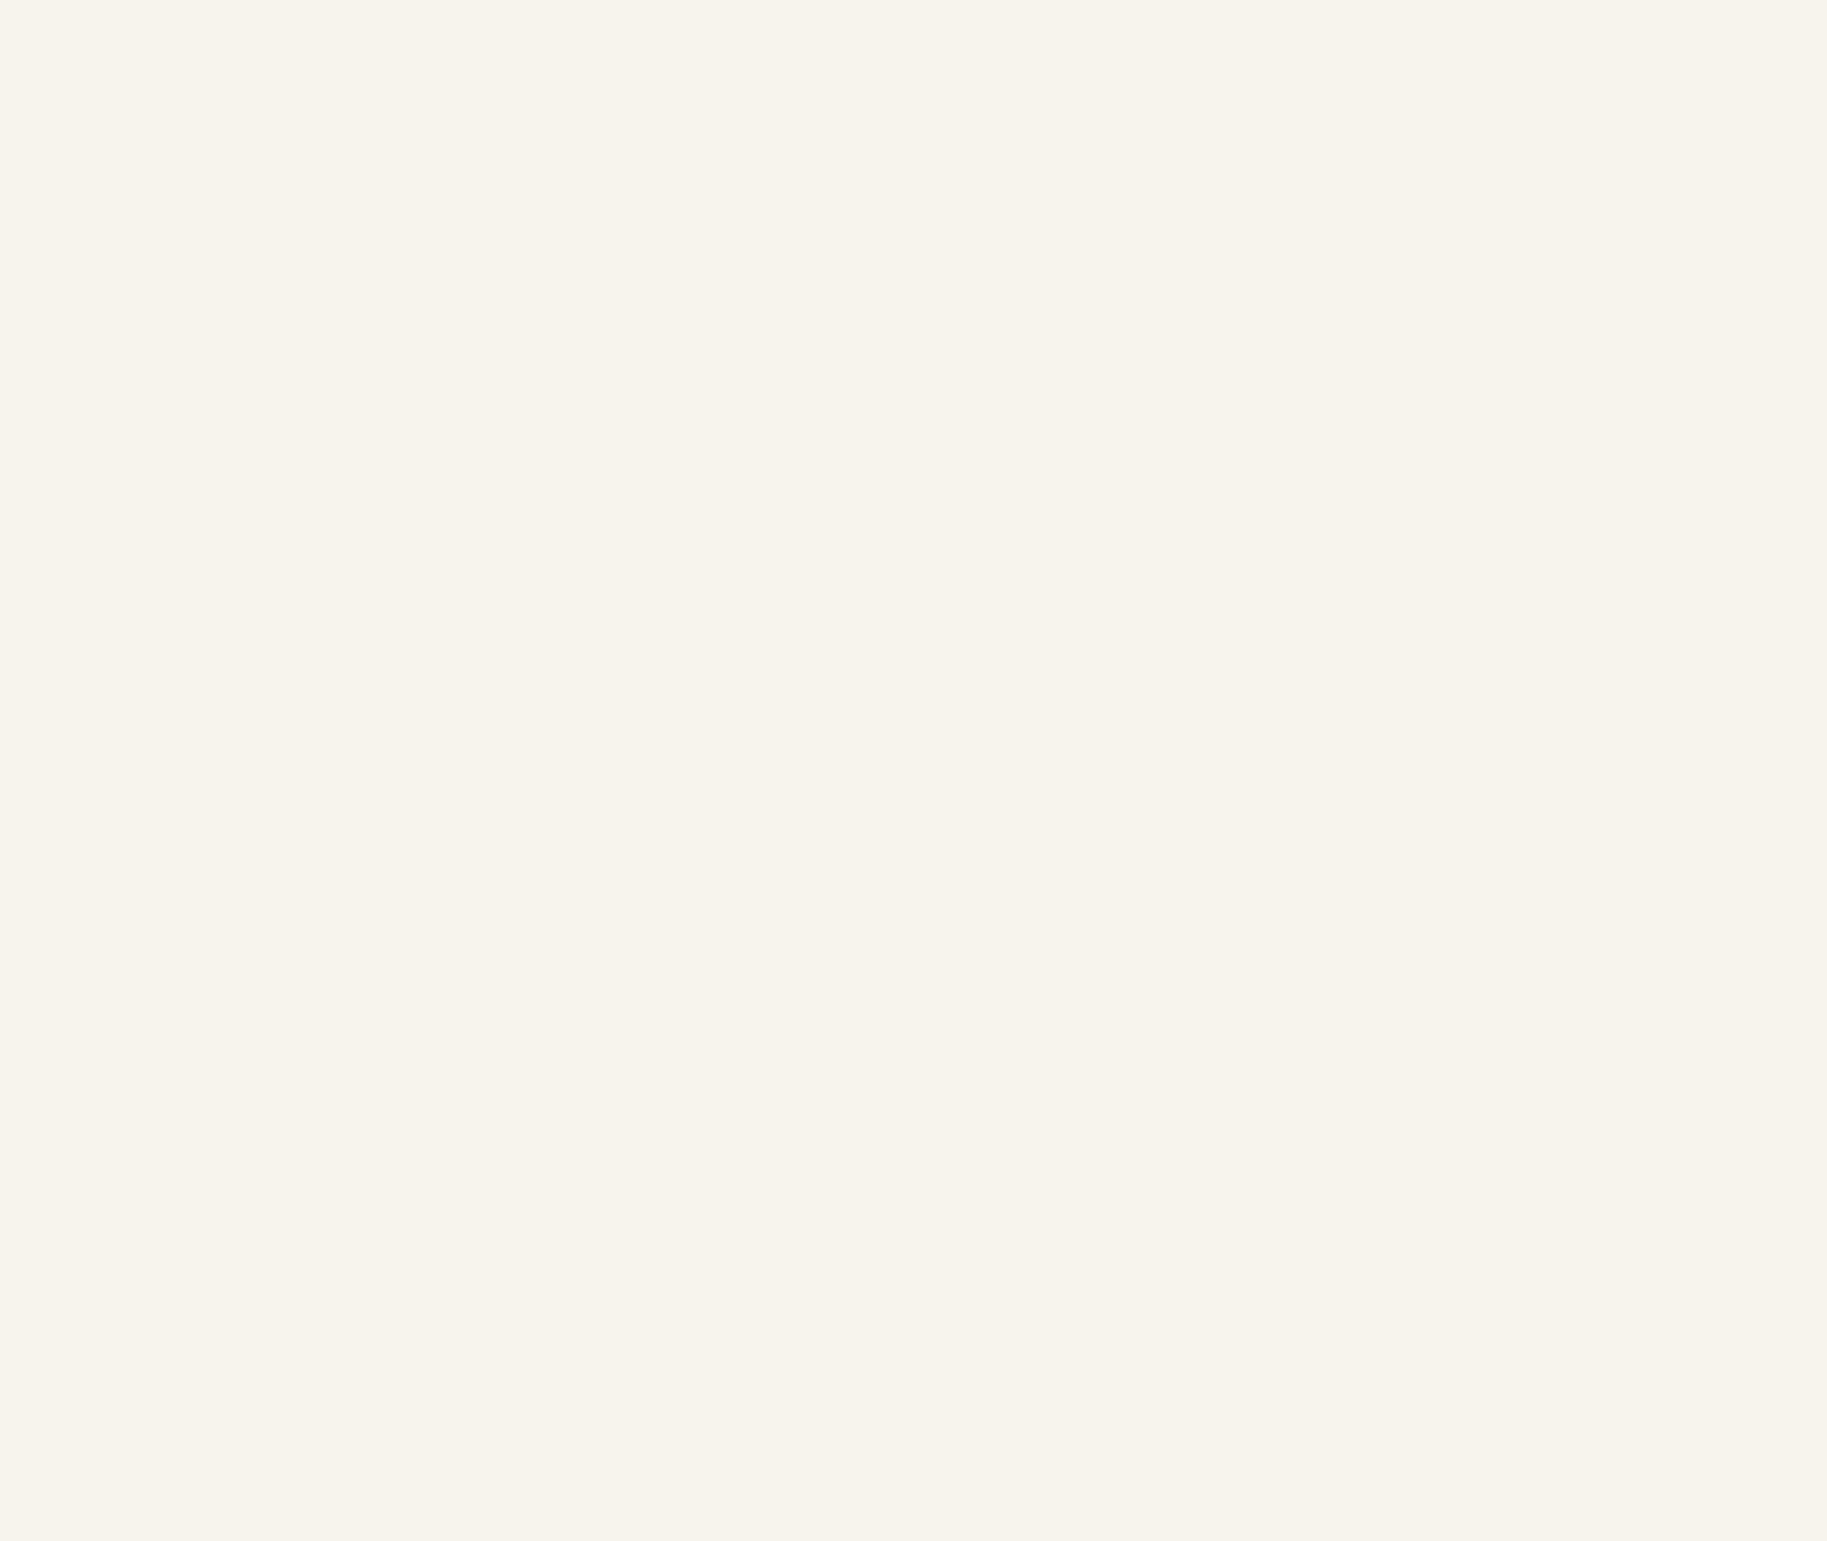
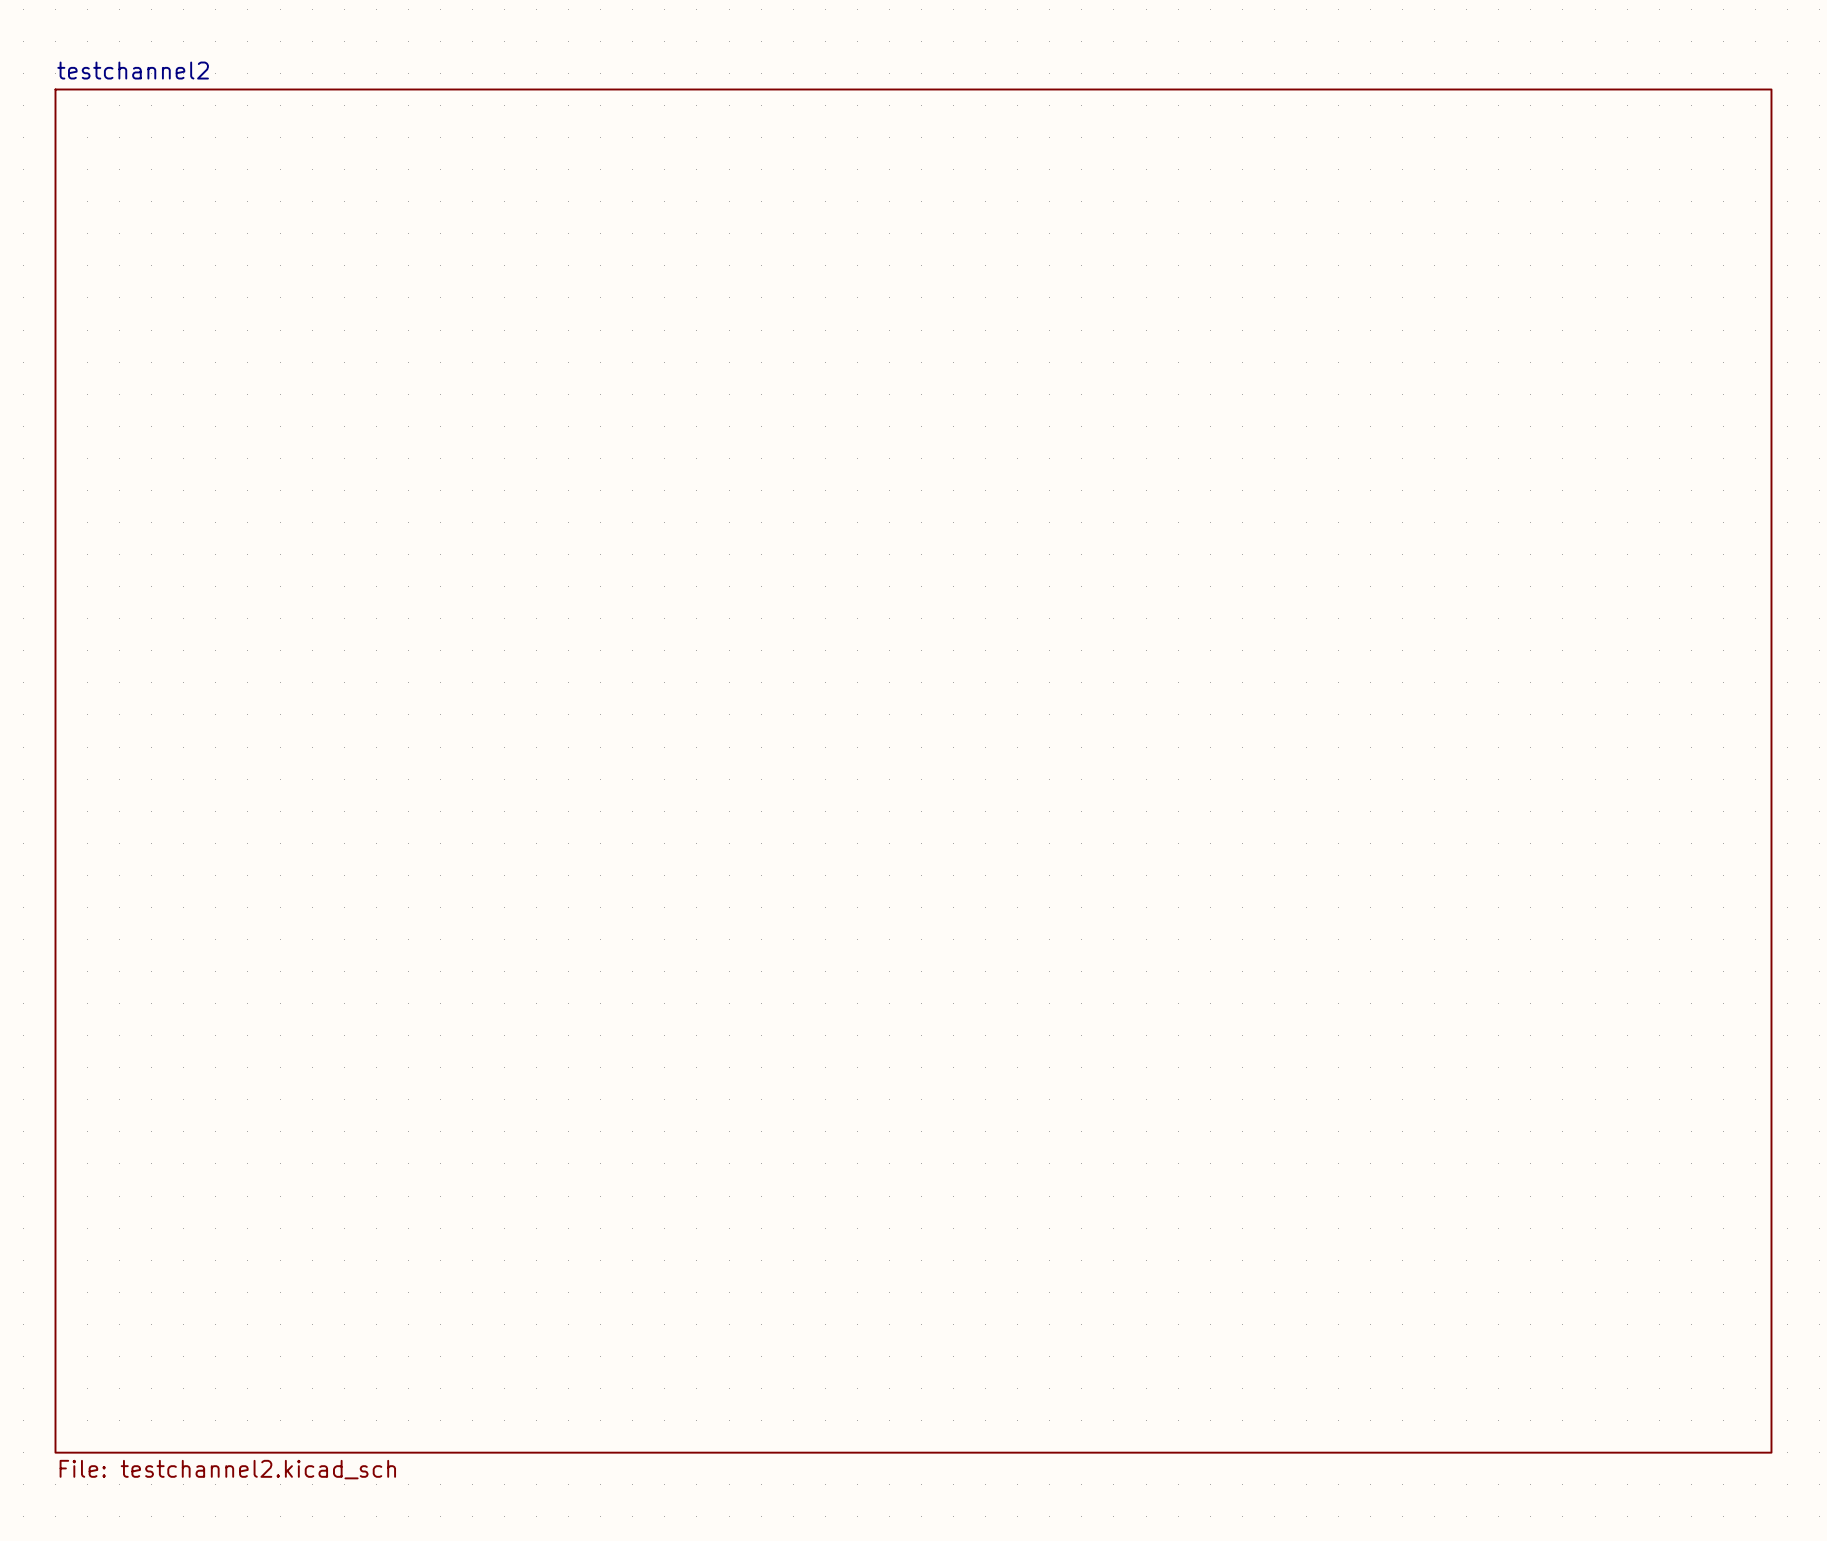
sheet testchannel2: none -> File: testchannel2.kicad_sch (913, 771)

